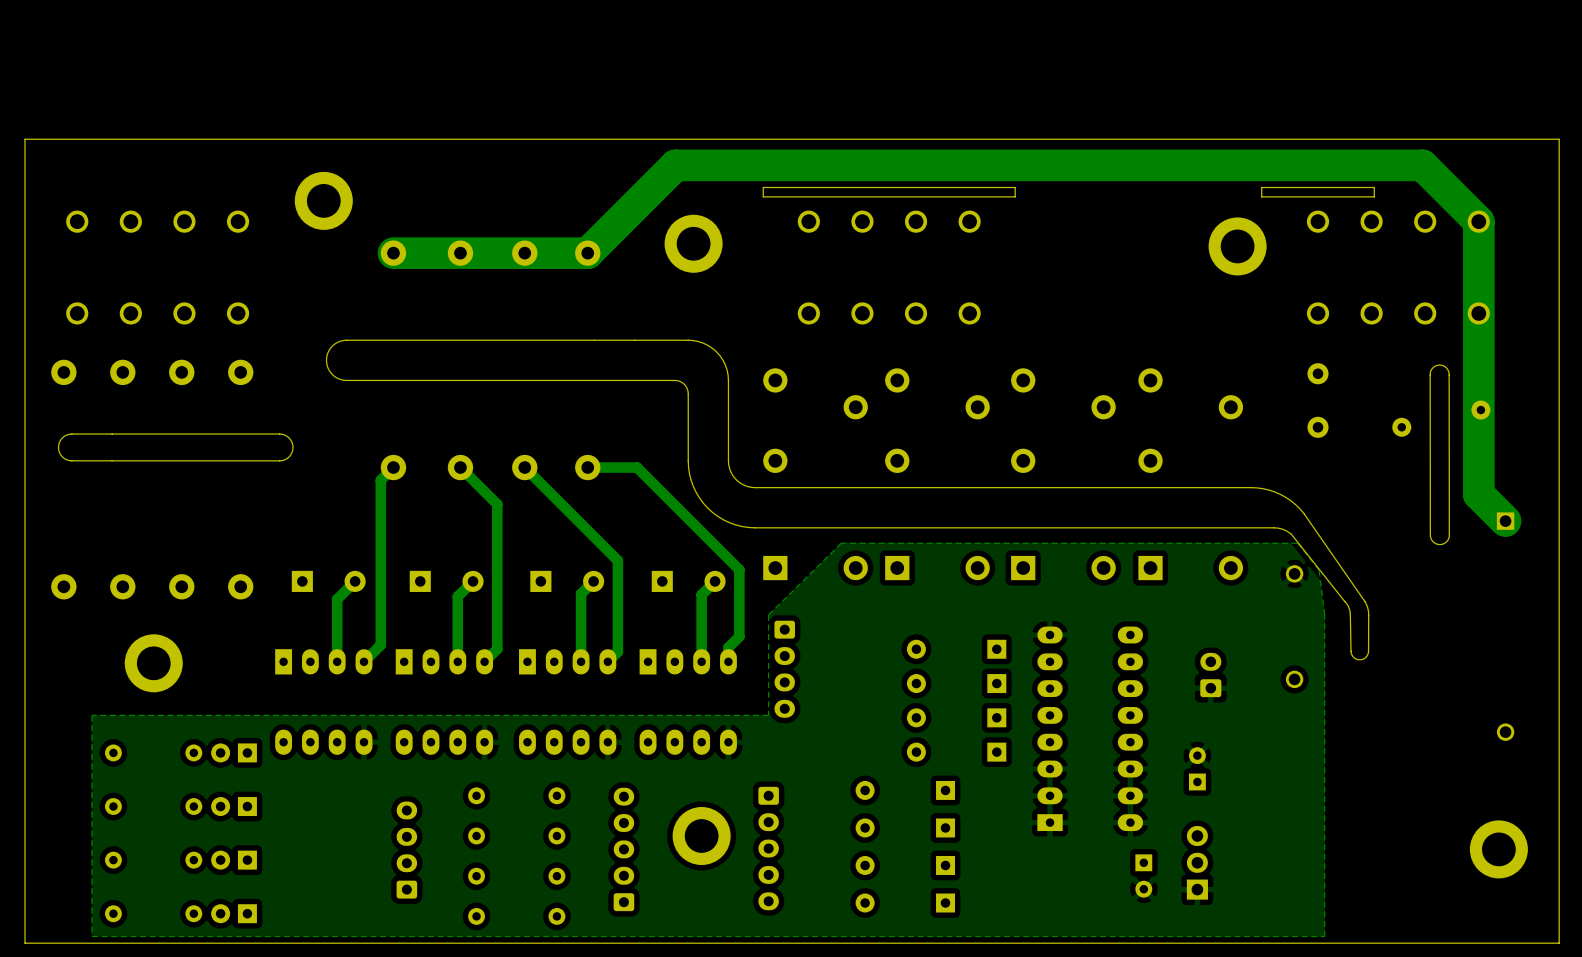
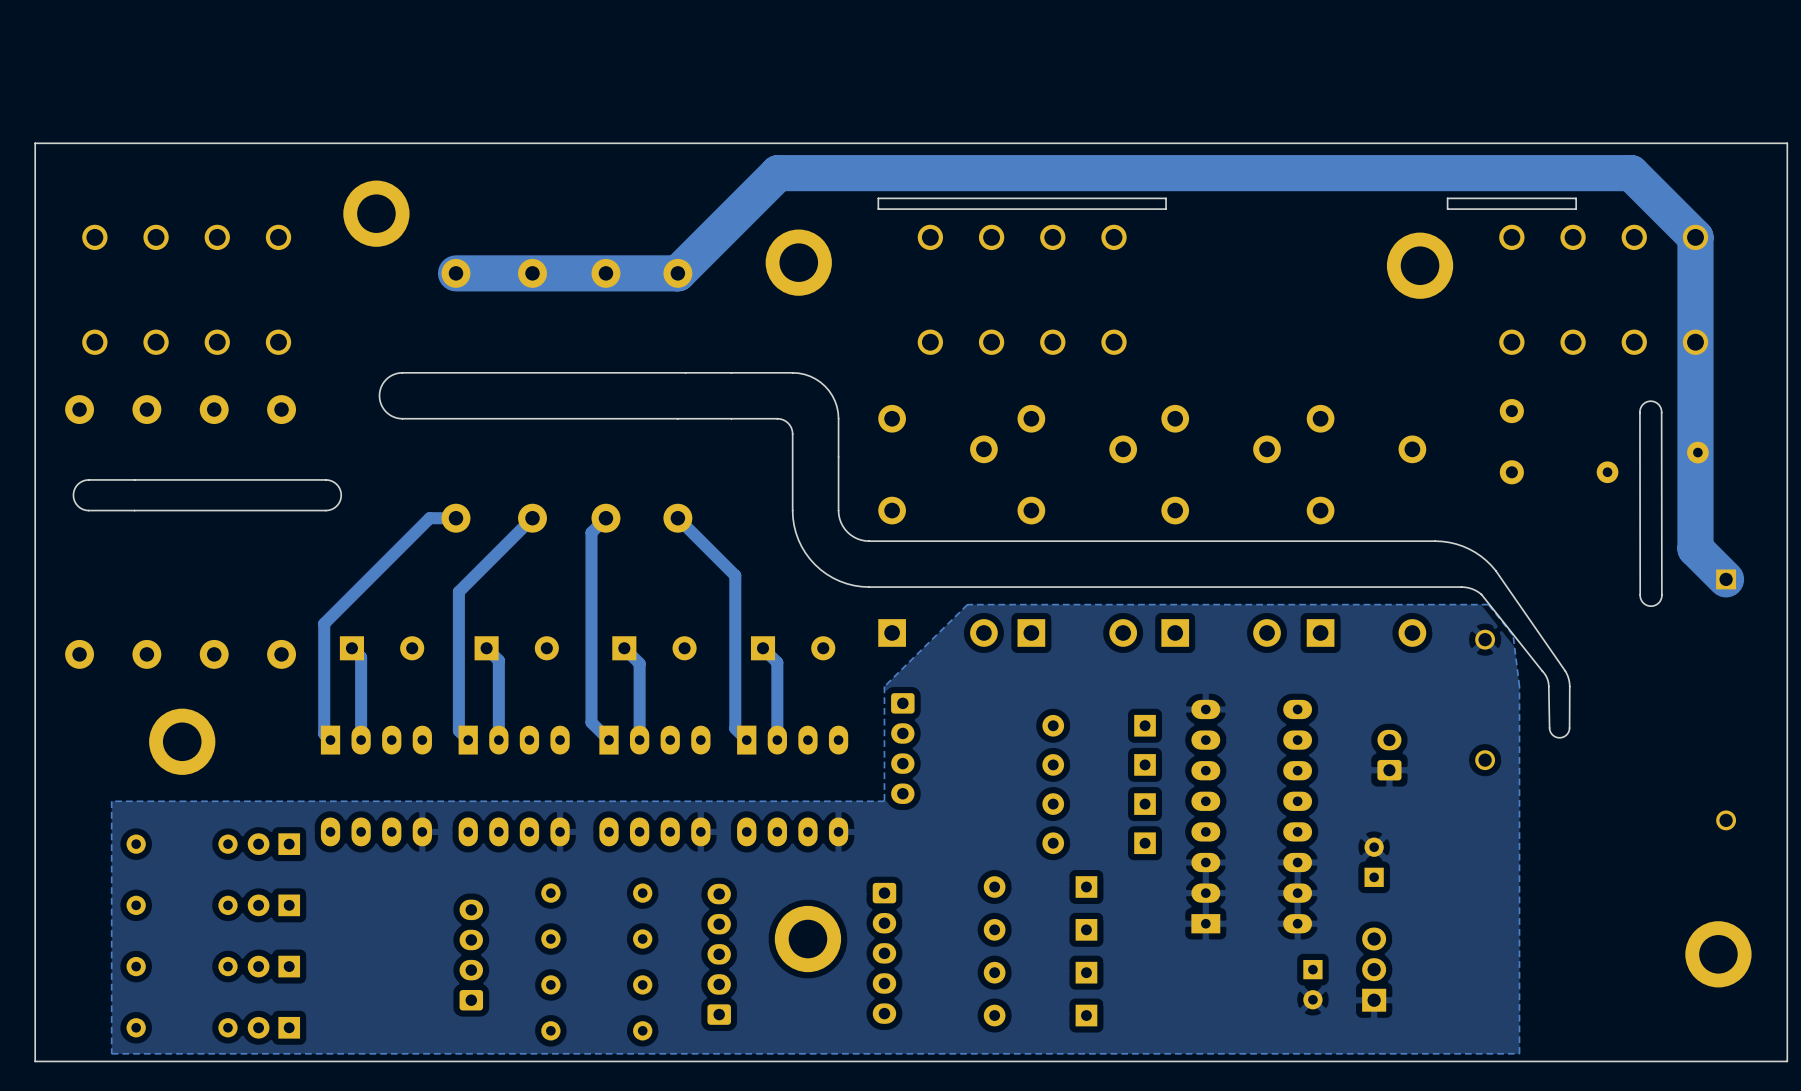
track: (393, 467) (380, 480) (380, 645) (364, 661) -> (456, 518) (429, 518) (324, 623) (324, 733) (330, 740)
track: (460, 467) (497, 504) (497, 649) (484, 661) -> (532, 518) (458, 591) (458, 730) (468, 740)
track: (524, 467) (617, 560) (617, 651) (607, 661) -> (605, 518) (591, 532) (591, 722) (609, 740)
track: (587, 467) (637, 467) (739, 569) (739, 636) (728, 647) (728, 661) -> (677, 518) (735, 575) (735, 728) (746, 740)
track: none -> (351, 648) (361, 657) (361, 740)
track: (355, 581) (337, 599) (337, 661) -> none
track: none -> (486, 648) (498, 660) (498, 740)
track: (473, 581) (457, 596) (457, 661) -> none
track: none -> (624, 648) (639, 663) (639, 740)
track: (593, 581) (581, 593) (581, 661) -> none
track: none -> (763, 648) (777, 662) (777, 740)
track: (715, 581) (701, 594) (701, 661) -> none

